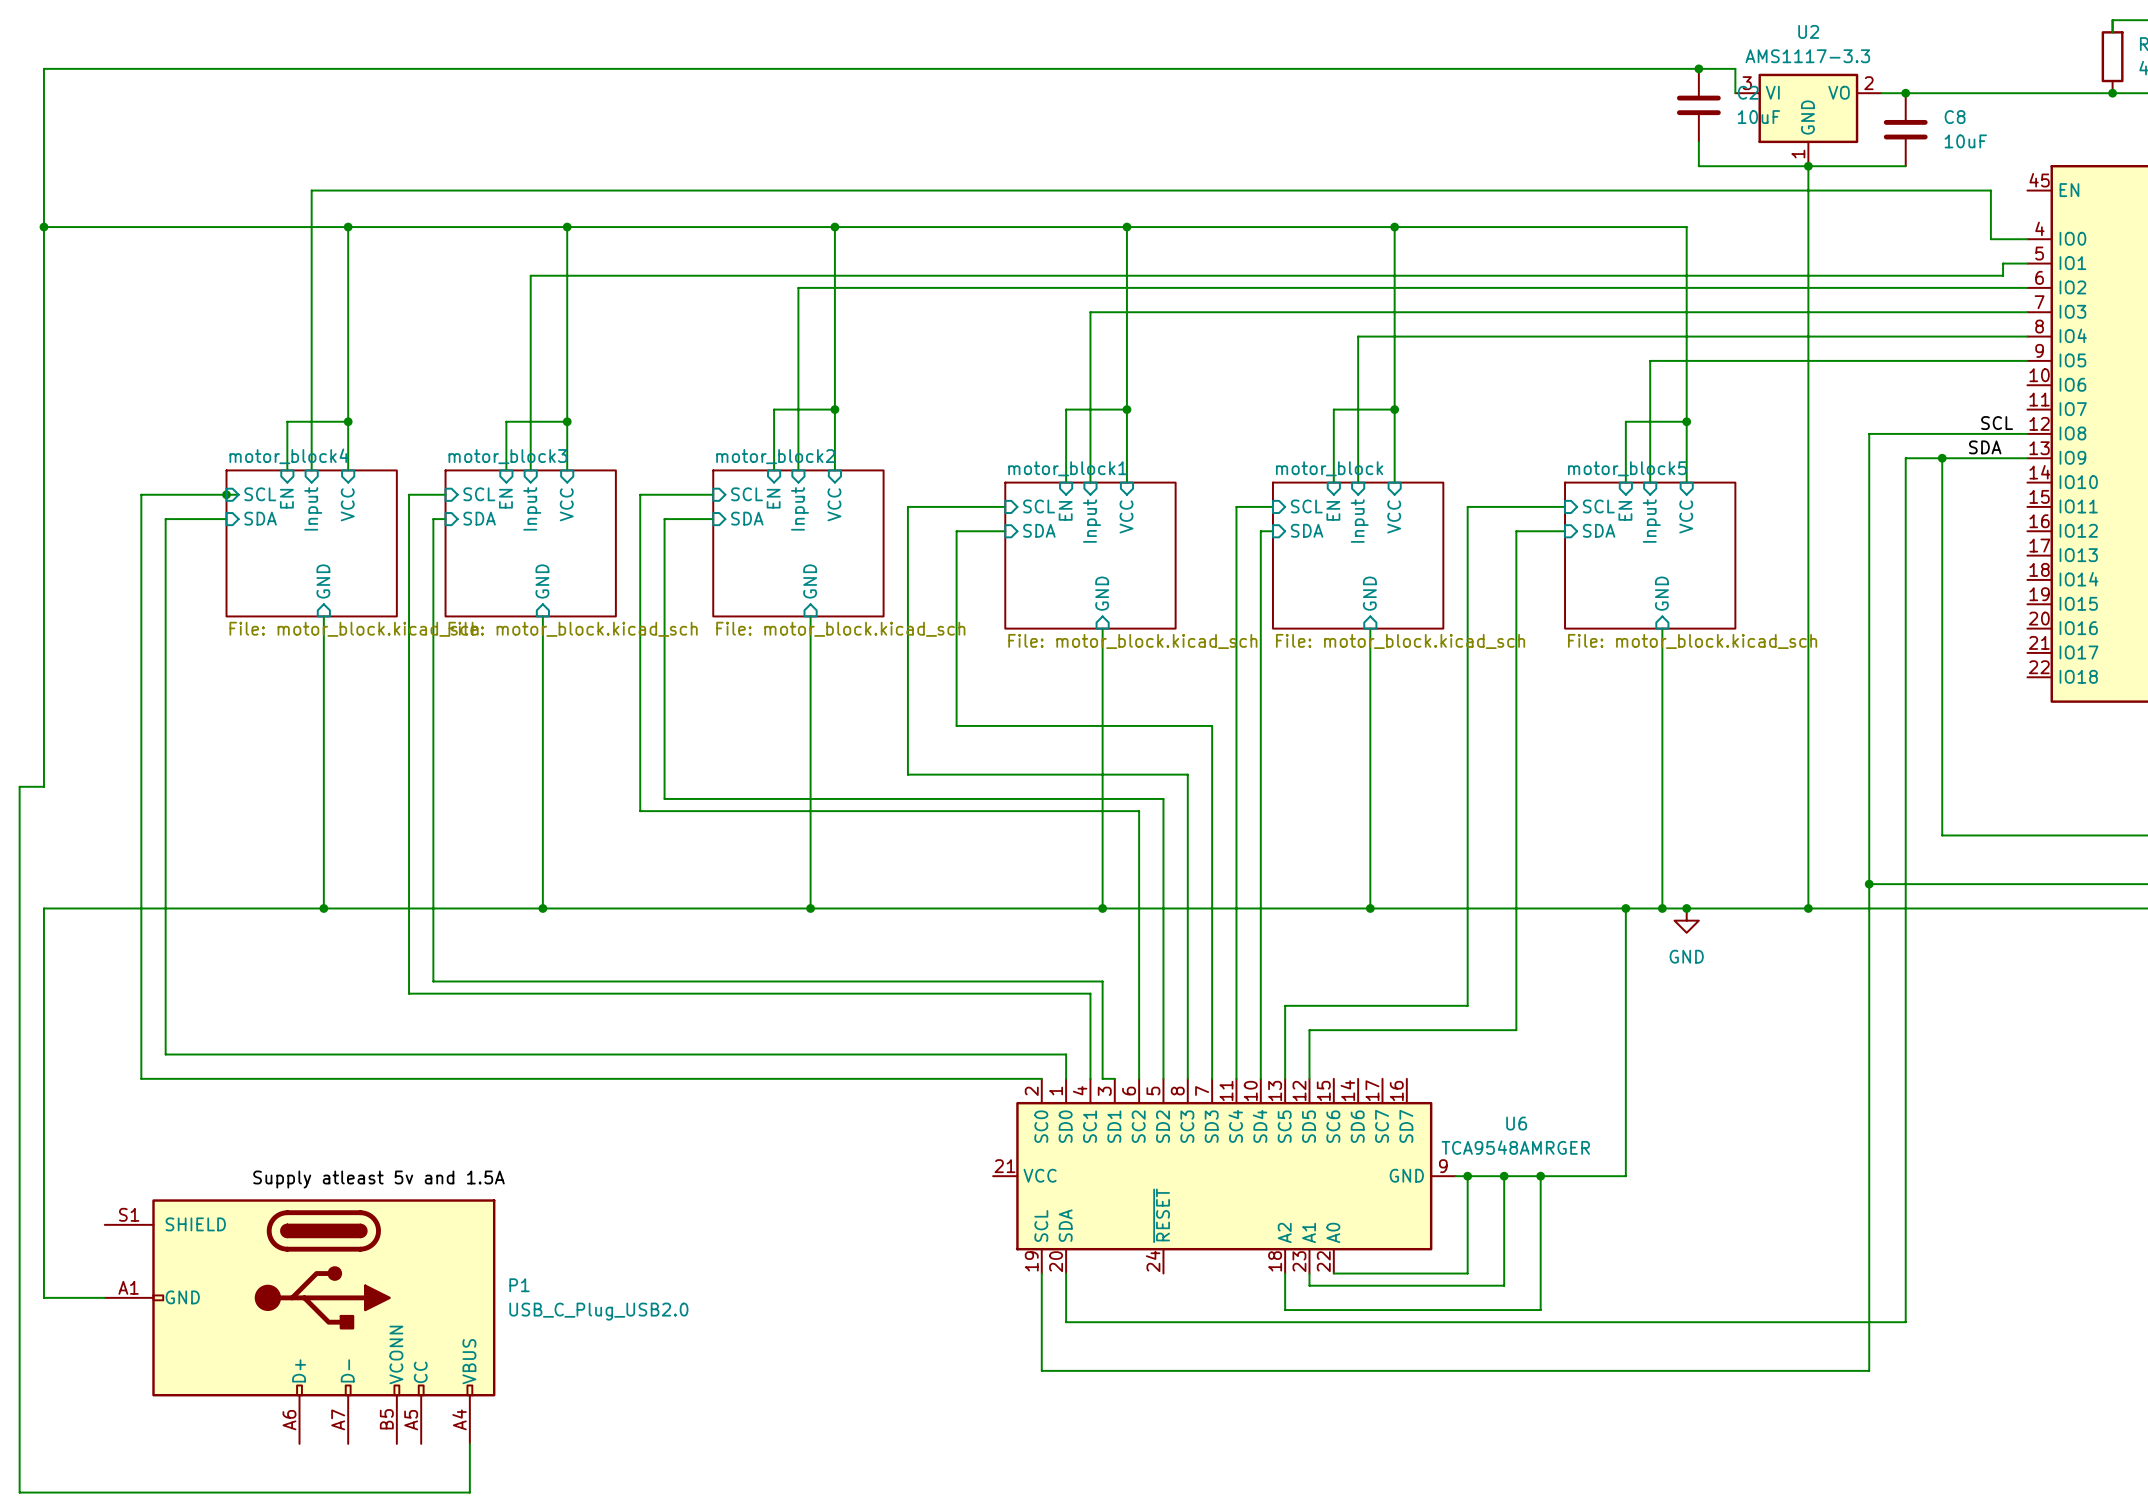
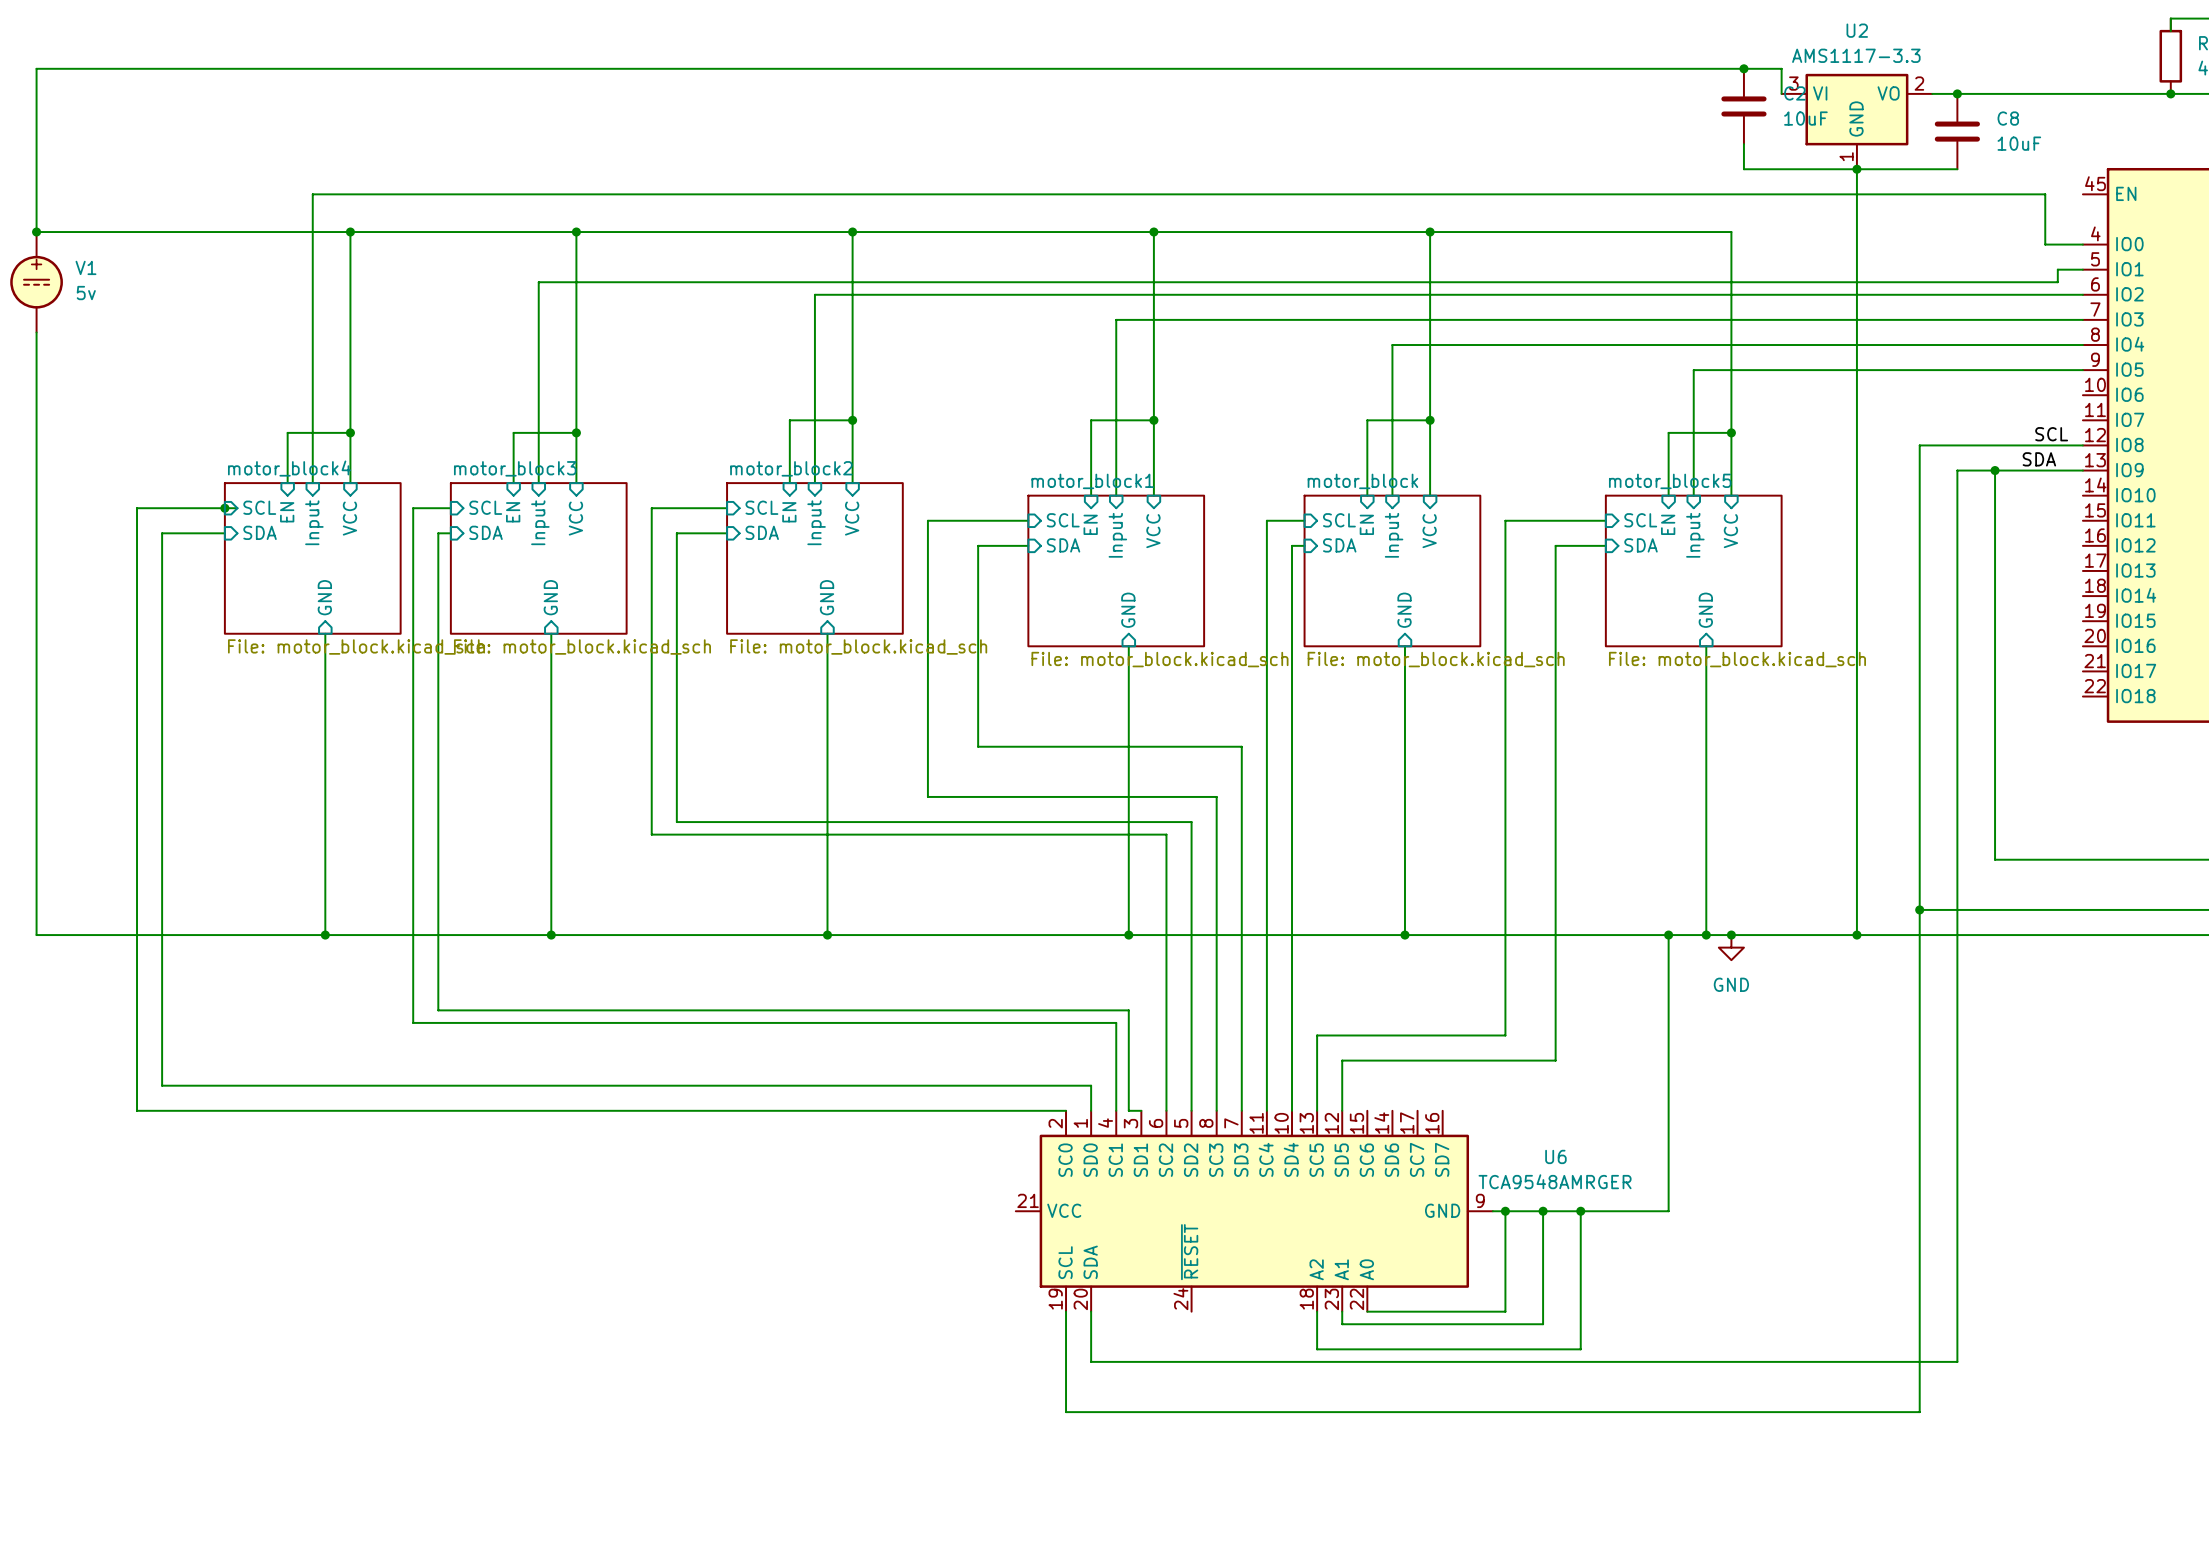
V1: none -> 5v (36, 282)
wire: (43, 786) (19, 786) (19, 1492) (469, 1492) (469, 1443) -> none
wire: (43, 908) (43, 1297) (104, 1297) -> (36, 935) (36, 809)
label: Supply atleast 5v and 1.5A (378, 1179) -> none
P1: USB_C_Plug_USB2.0 (300, 1321) -> none

